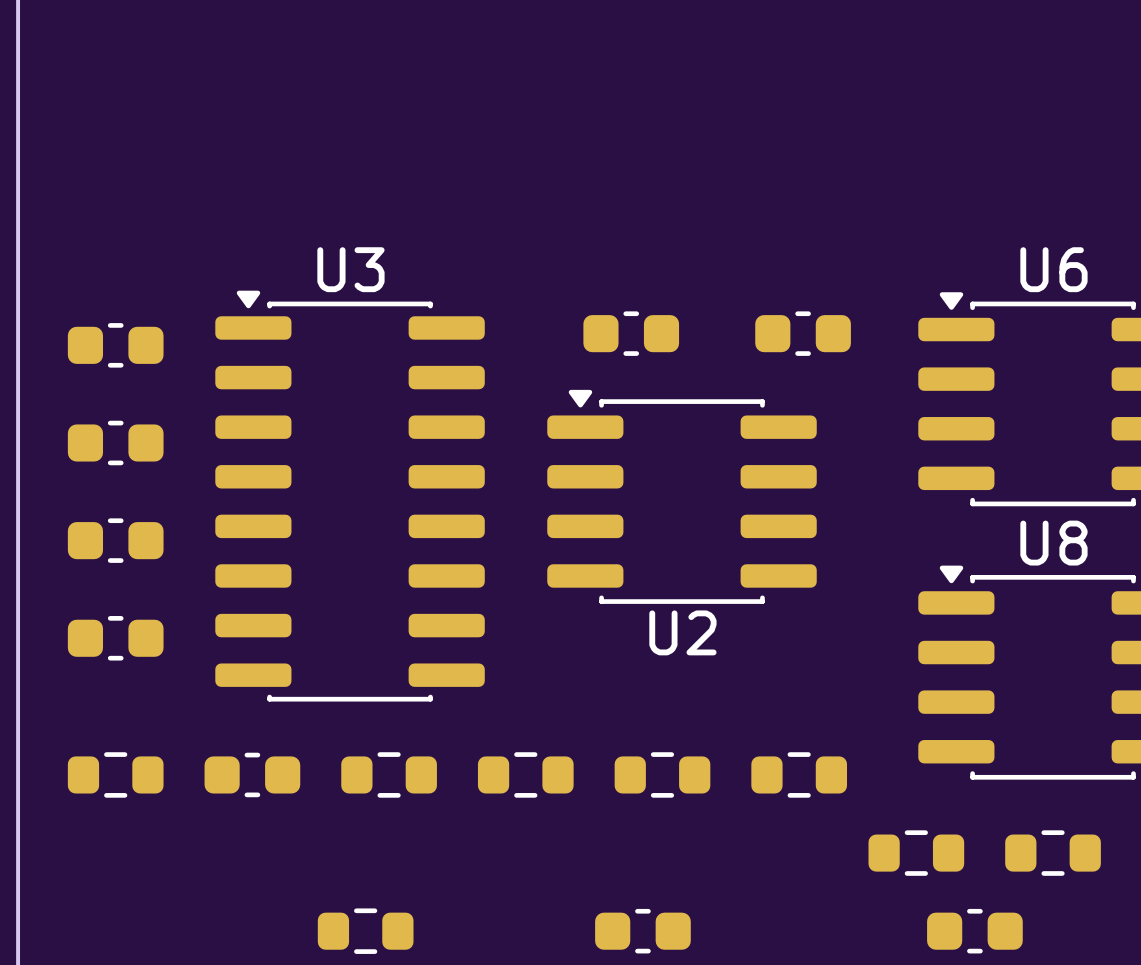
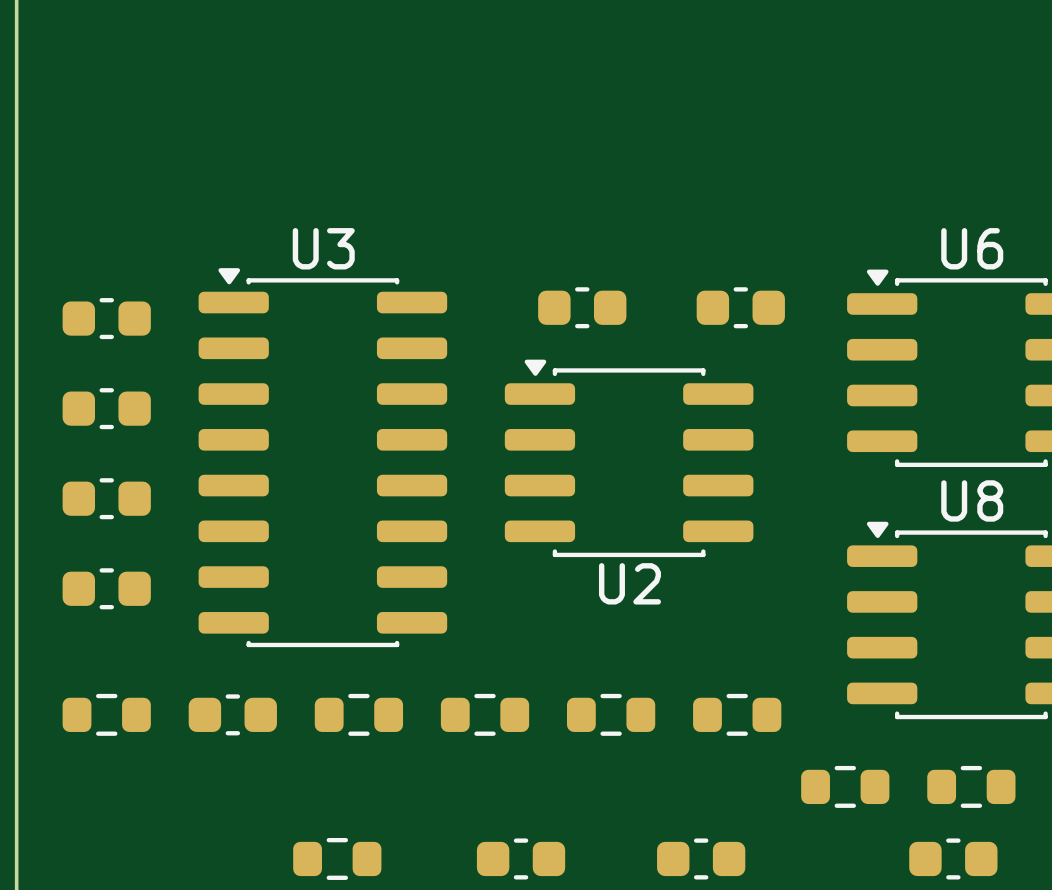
part: none -> (521, 858)
part: (642, 931) -> none
part: none -> (701, 858)
part position: (974, 931) -> (953, 858)

